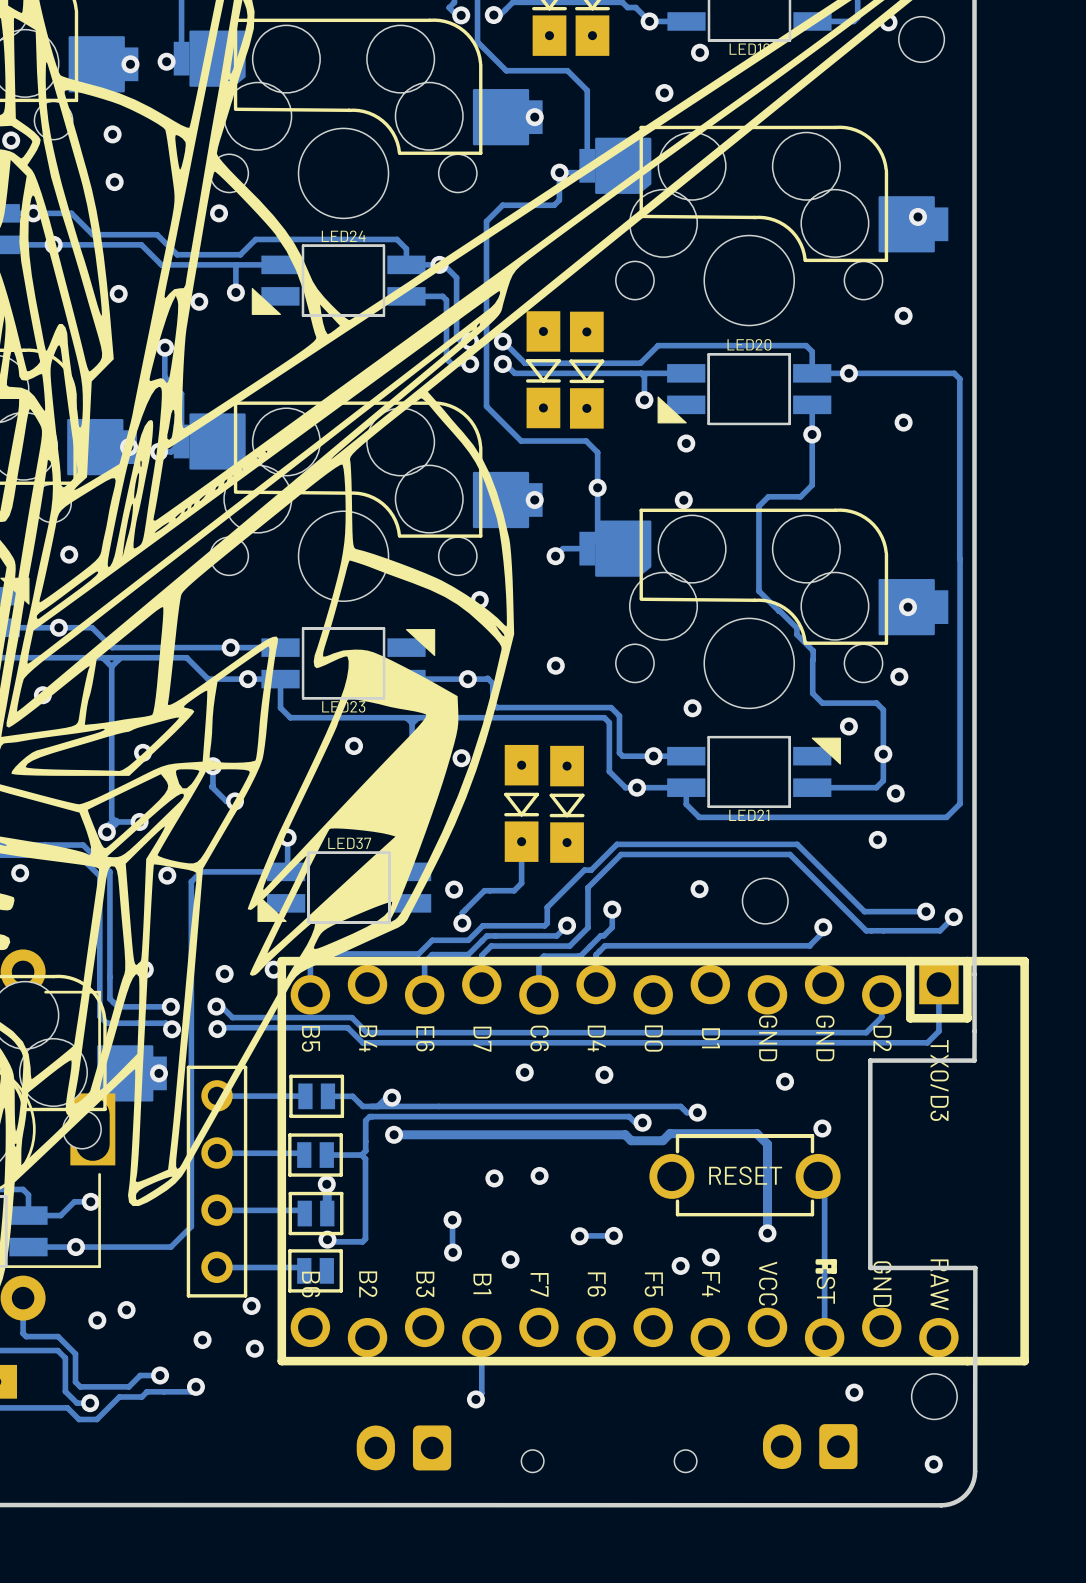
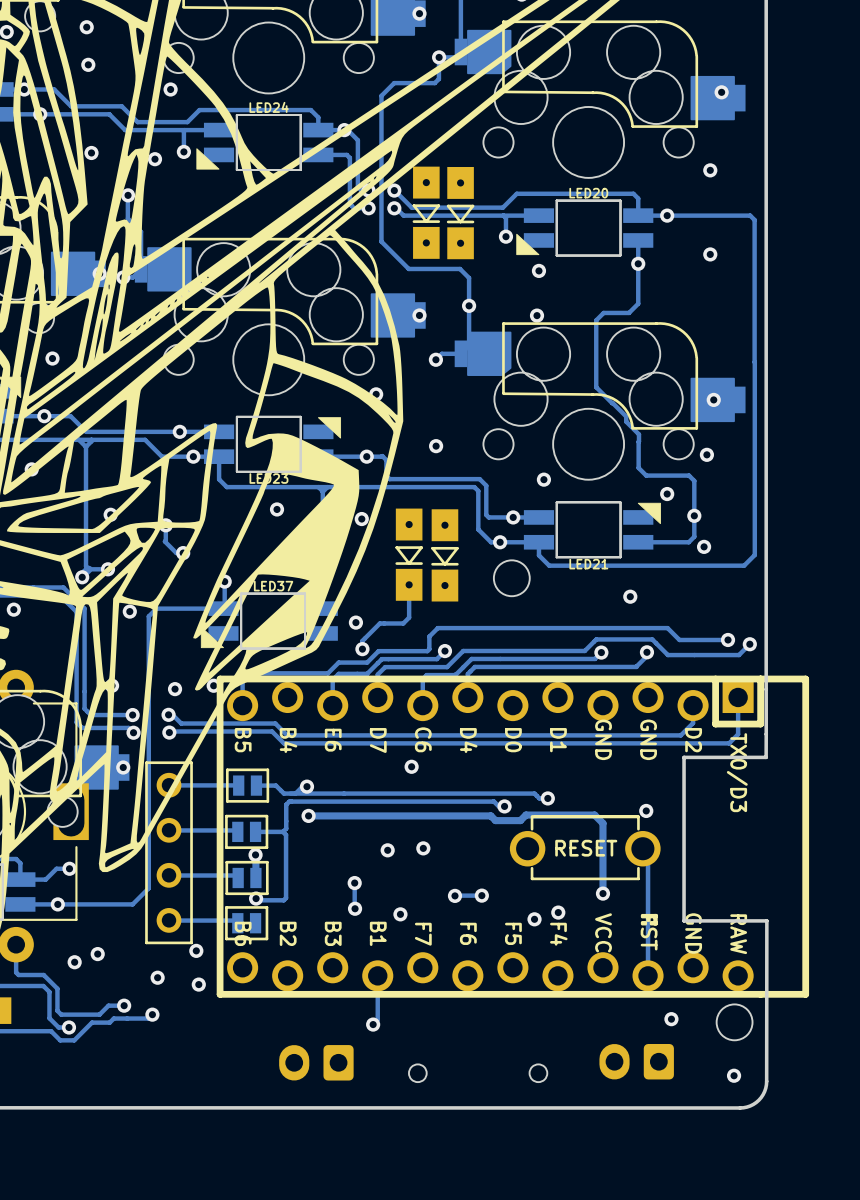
via: (877, 839) -> none
via: none -> (630, 596)
via: (699, 889) -> none
track: (849, 896) (797, 844) (616, 844) (591, 870) (584, 870) (558, 896) -> (667, 628) (437, 628)
round board edge position: (765, 901) -> (511, 578)
track: (612, 909) (612, 927) (603, 935) -> (601, 652) (595, 658) (474, 658)
via: (612, 909) -> none
via: none -> (601, 652)
track: (866, 930) (789, 854) (621, 854) (587, 887) (587, 927) (569, 946) -> (680, 655) (667, 655) (652, 639) (596, 639) (584, 650) (463, 650) (447, 667)
via: (604, 1074) -> none
via: (785, 1081) -> none

